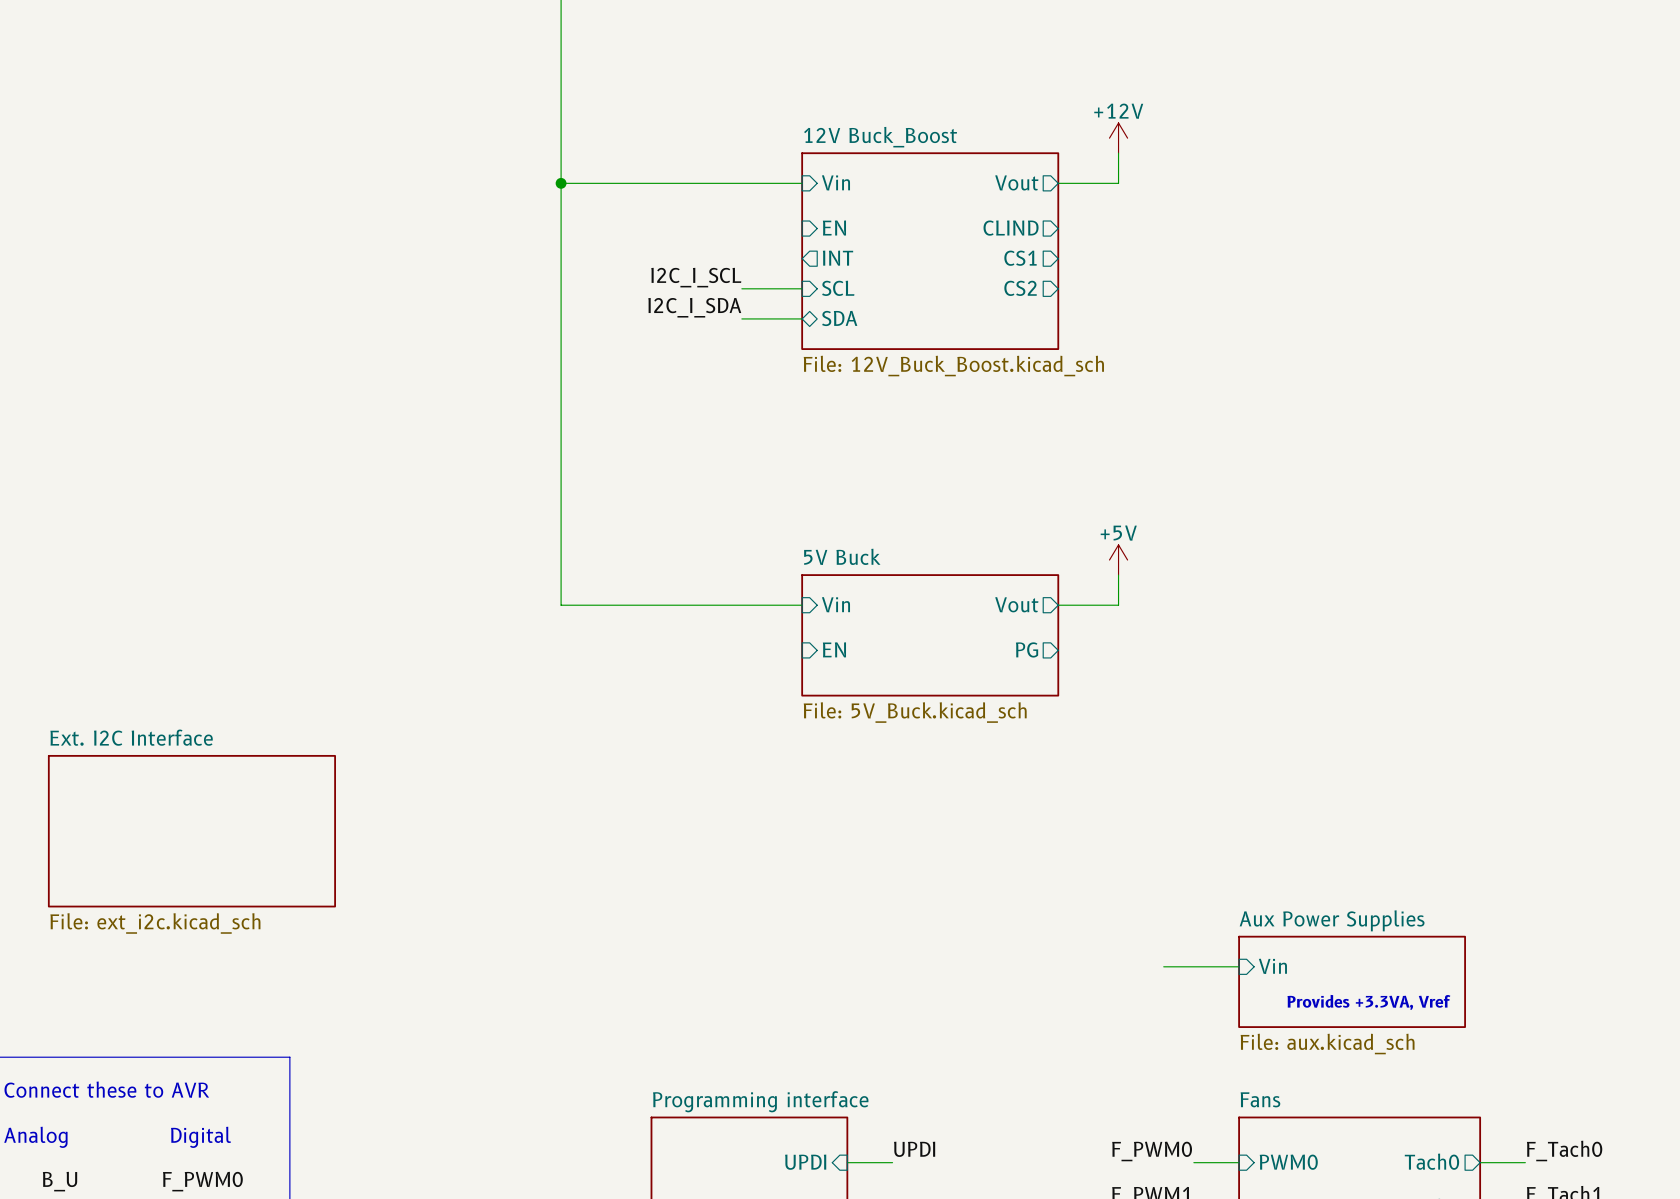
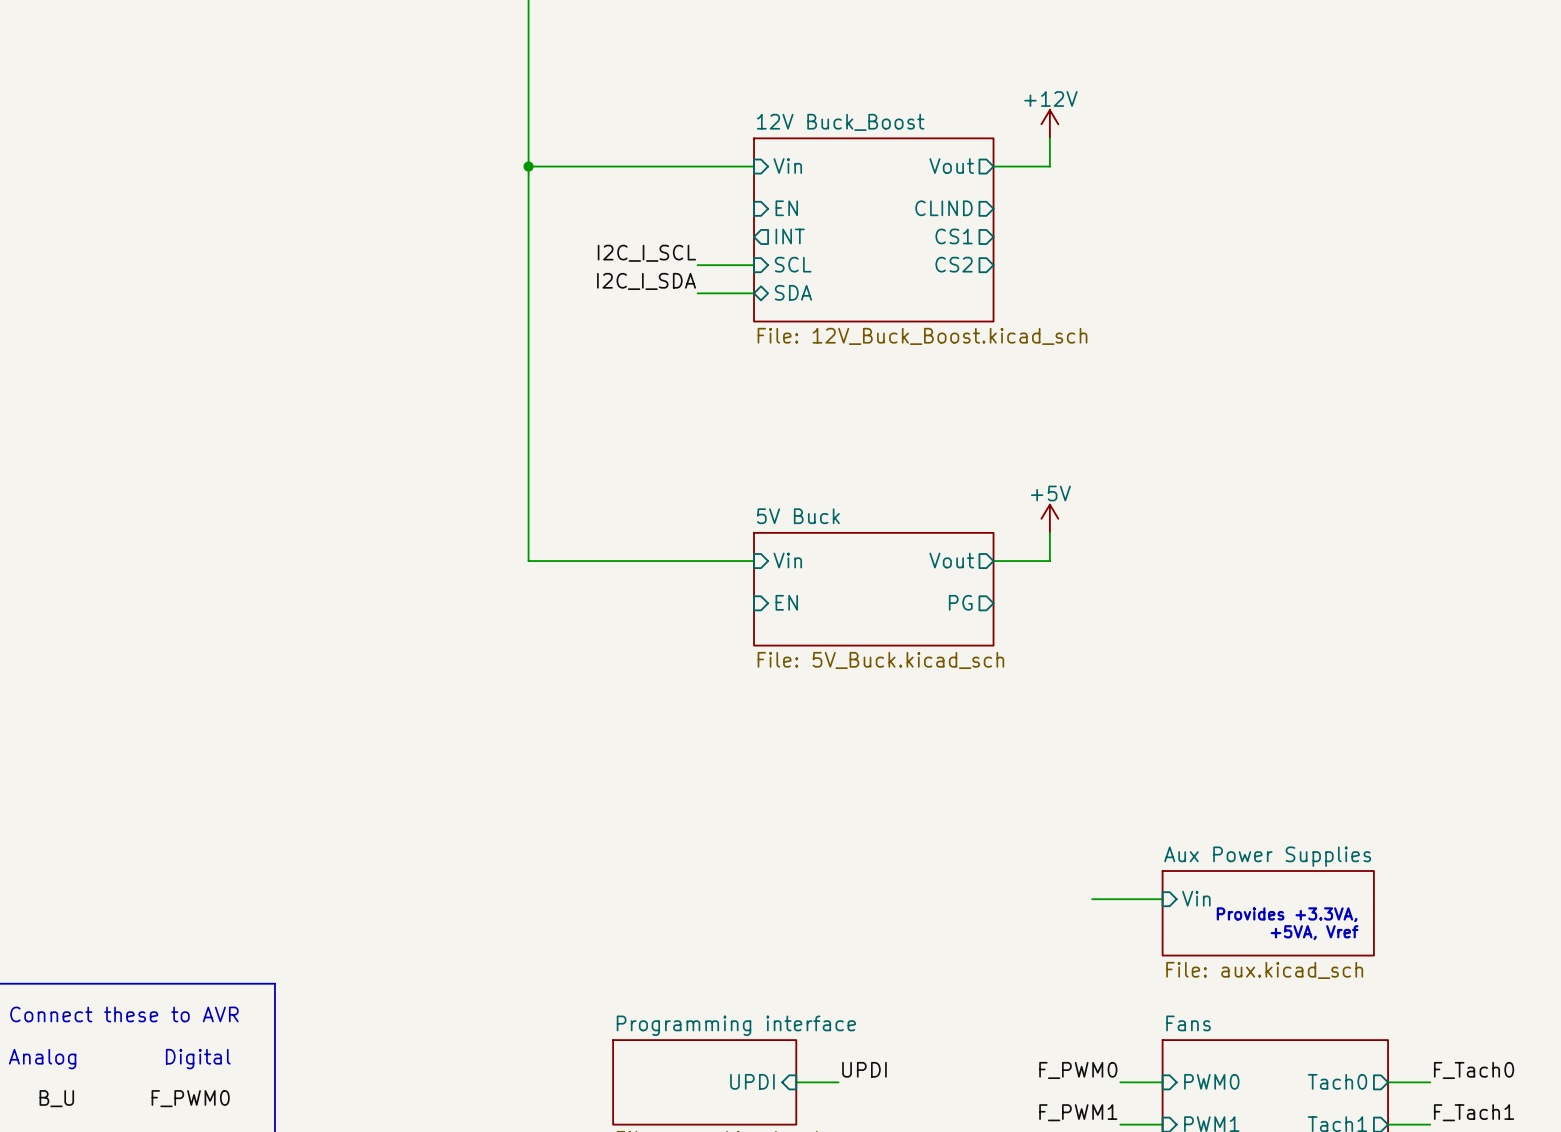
sheet Ext. I2C Interface: File: ext_i2c.kicad_sch (191, 831) -> none
text: none -> Provides +3.3VA, (1287, 914)
text: Provides +3.3VA, Vref (1368, 1002) -> +5VA, Vref (1314, 932)

